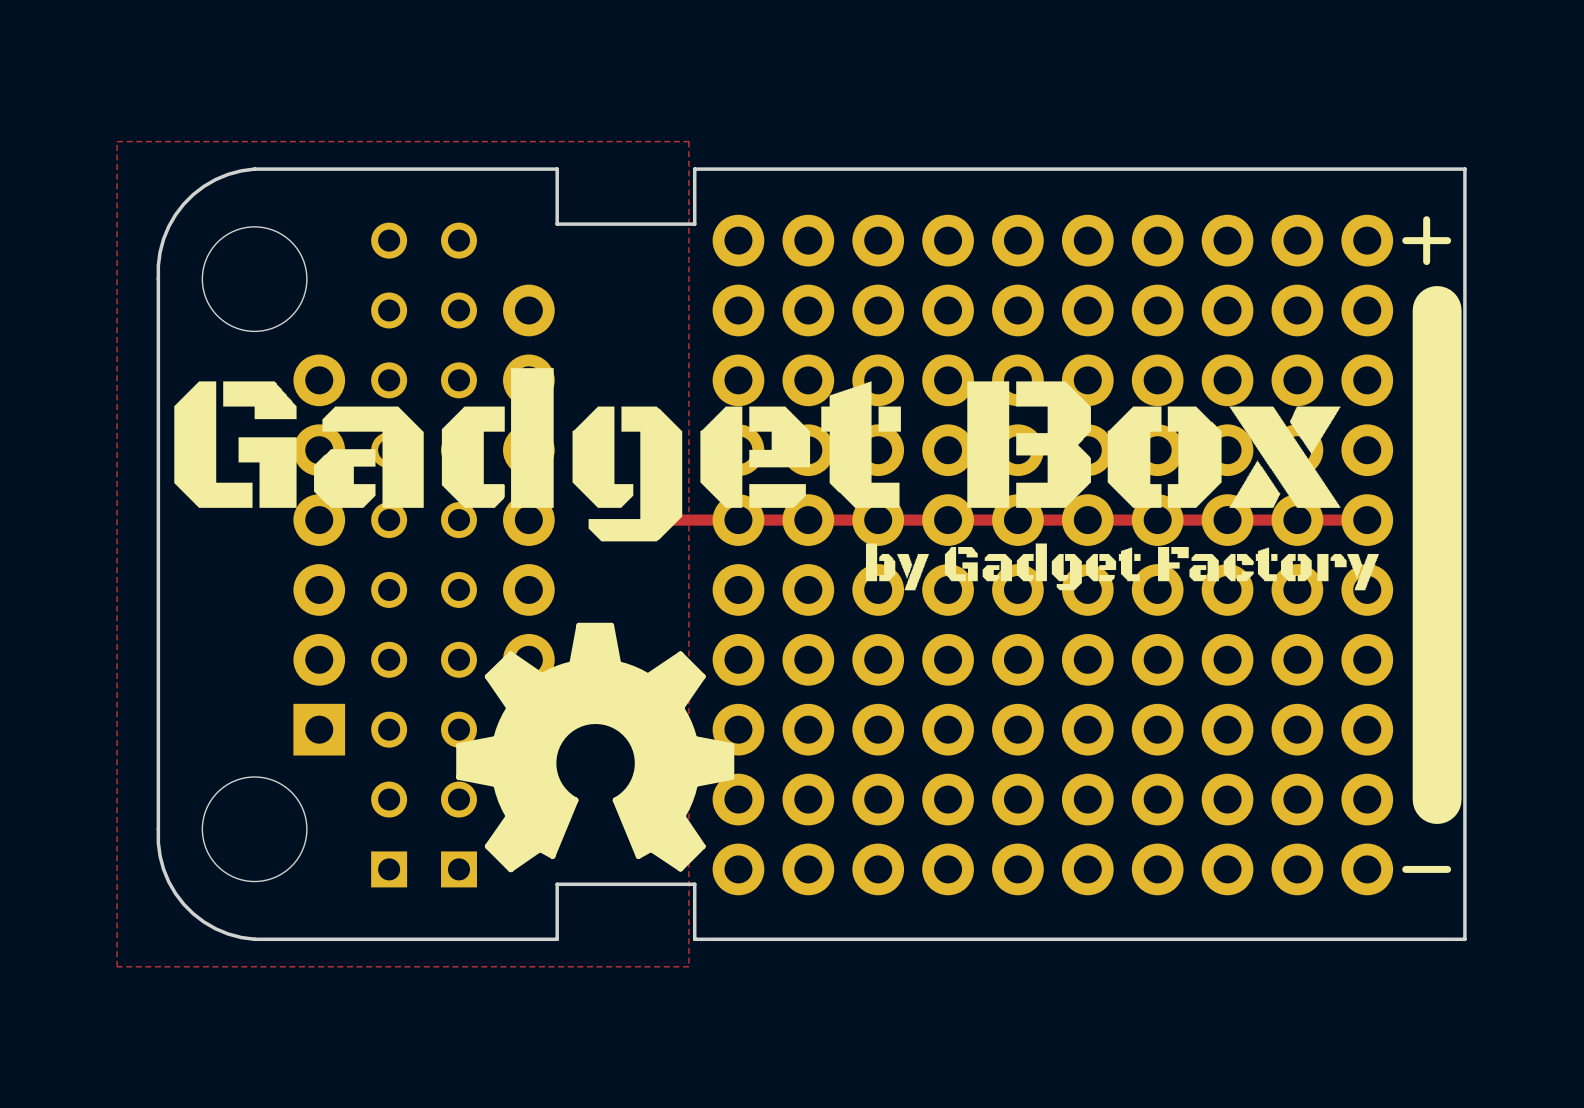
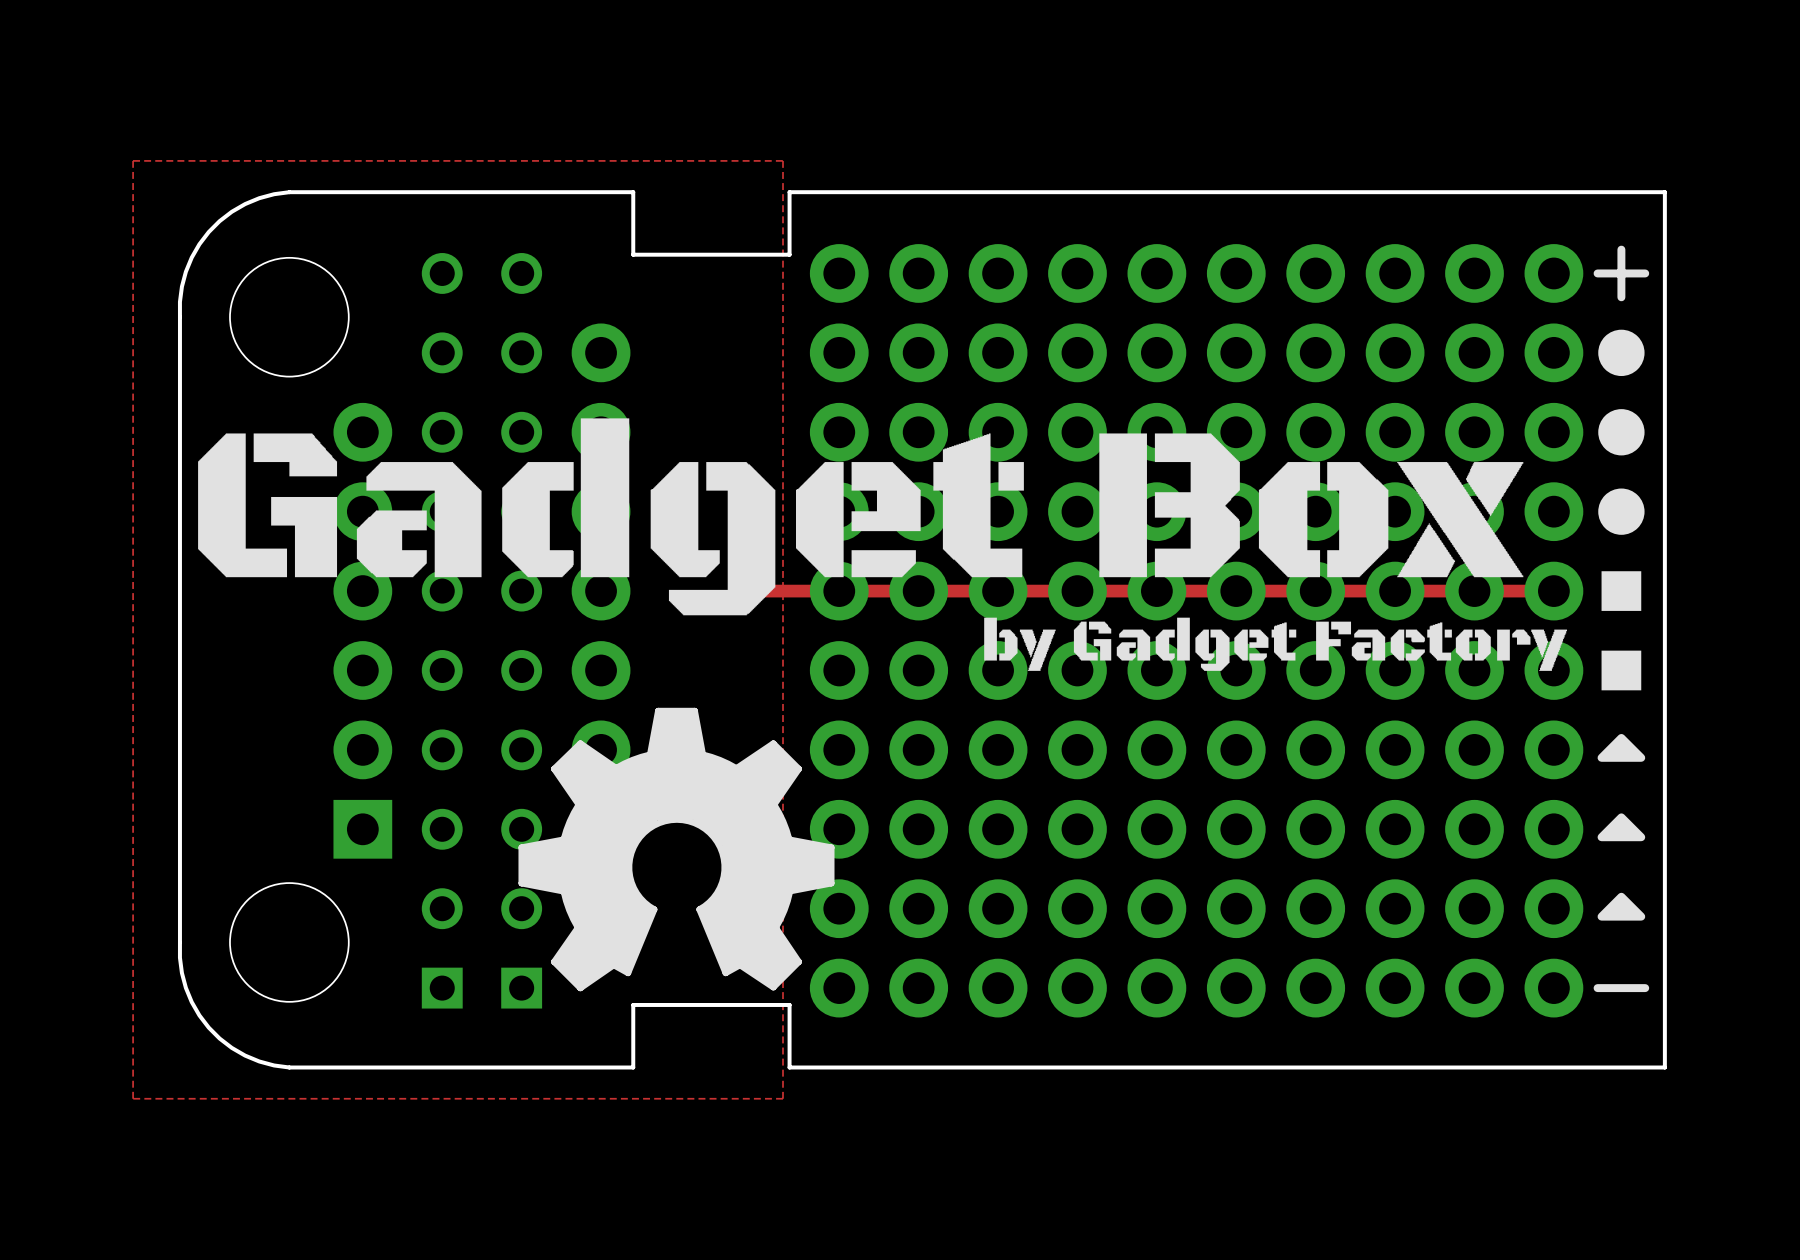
drawing: none -> [1598, 329, 1645, 611]
line: (1437, 310) (1437, 799) -> none
drawing: none -> [1601, 650, 1642, 691]
drawing: none -> [1597, 734, 1646, 762]
drawing: none -> [1597, 813, 1646, 842]
drawing: none -> [1597, 892, 1646, 921]

